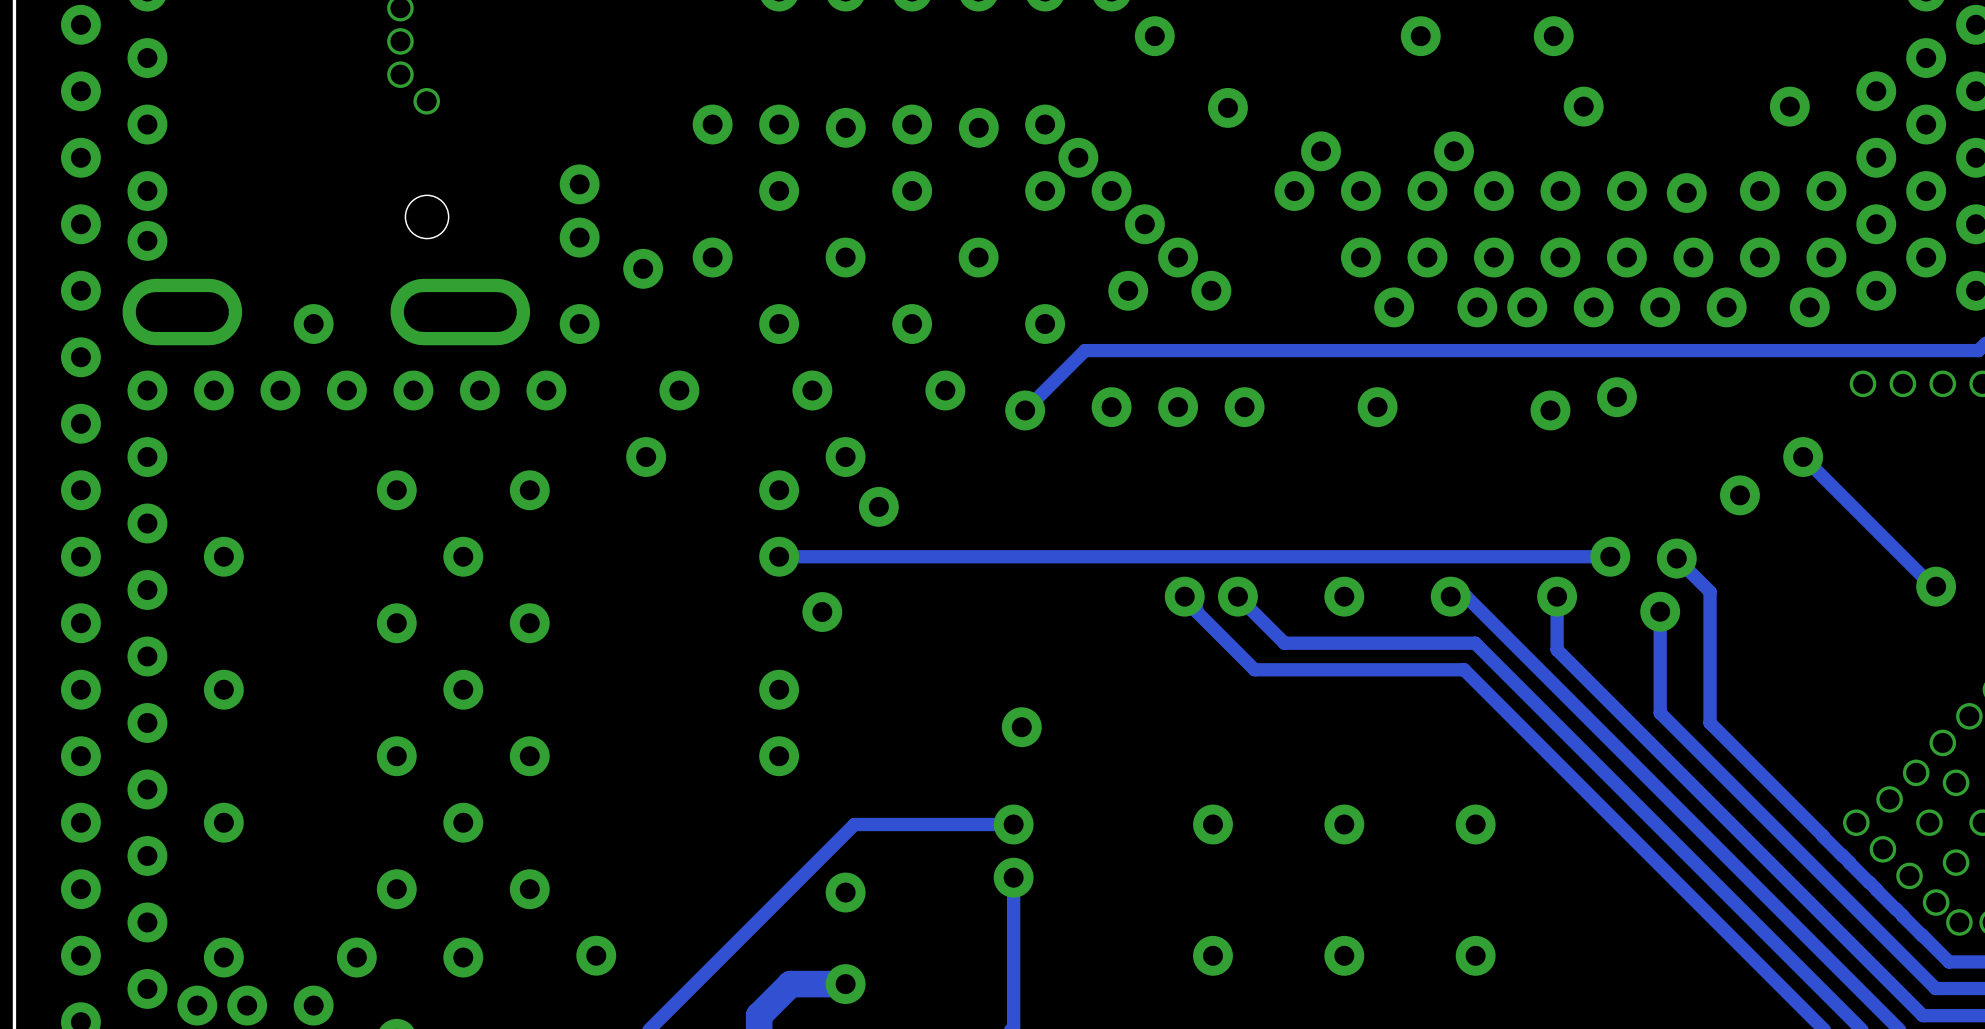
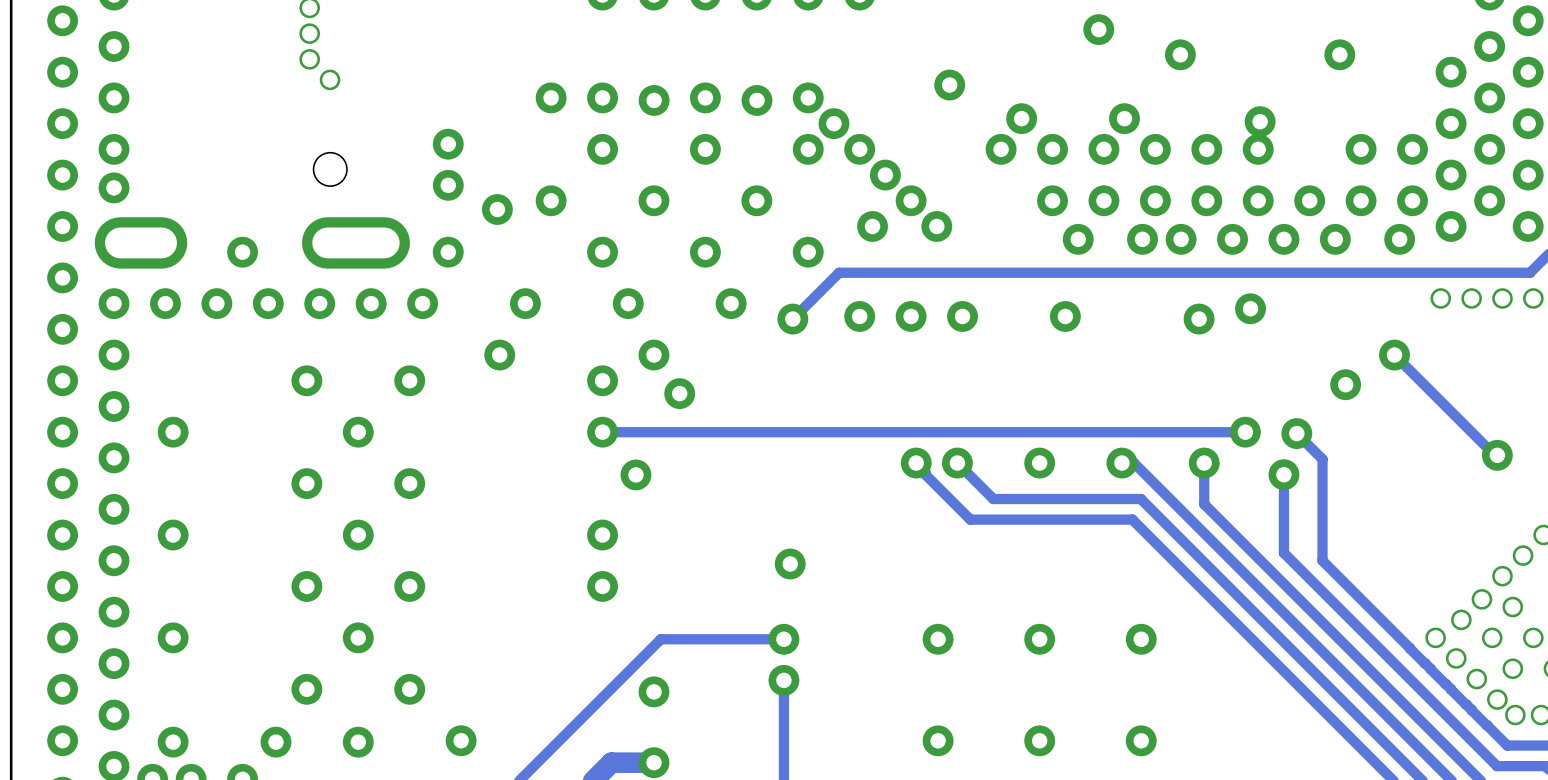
via: (1154, 36) -> none
via position: (1553, 36) -> (1180, 54)
via: none -> (1339, 54)
via: (1583, 106) -> none
via: (1789, 106) -> none
via: none -> (1260, 121)
via: (1686, 193) -> none

